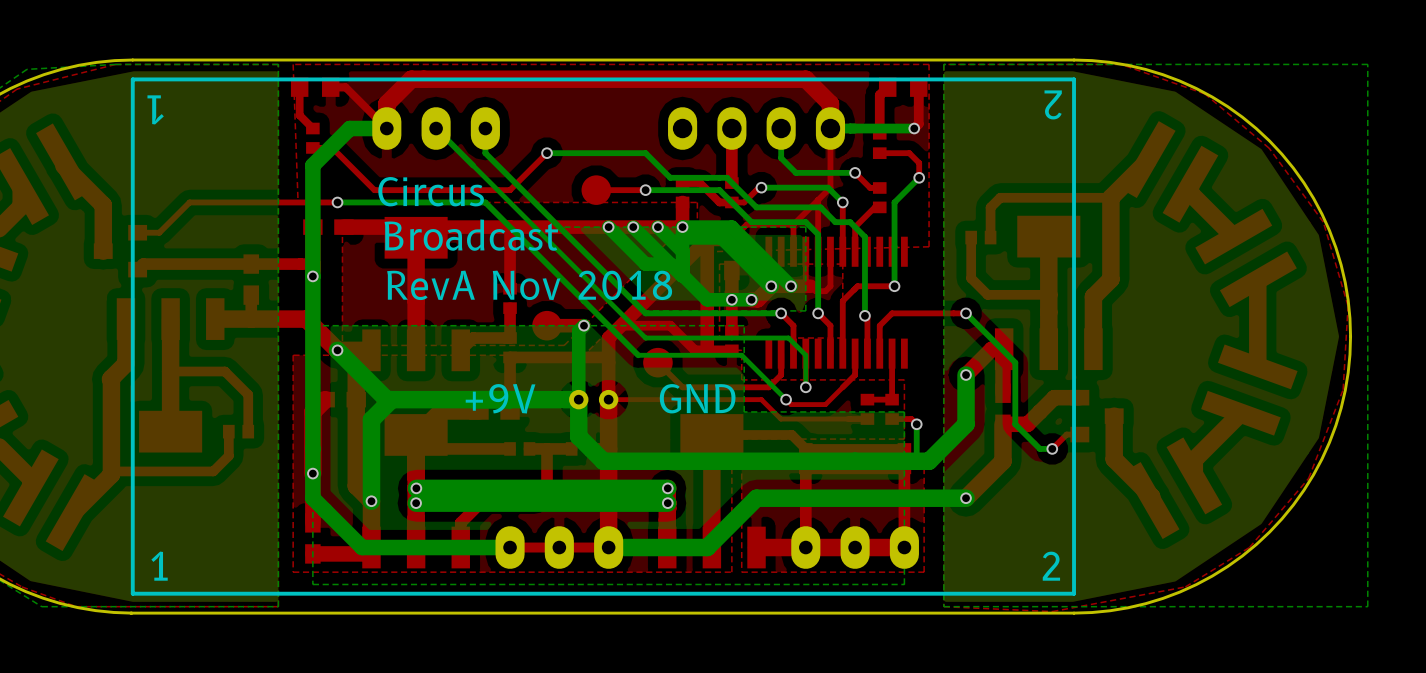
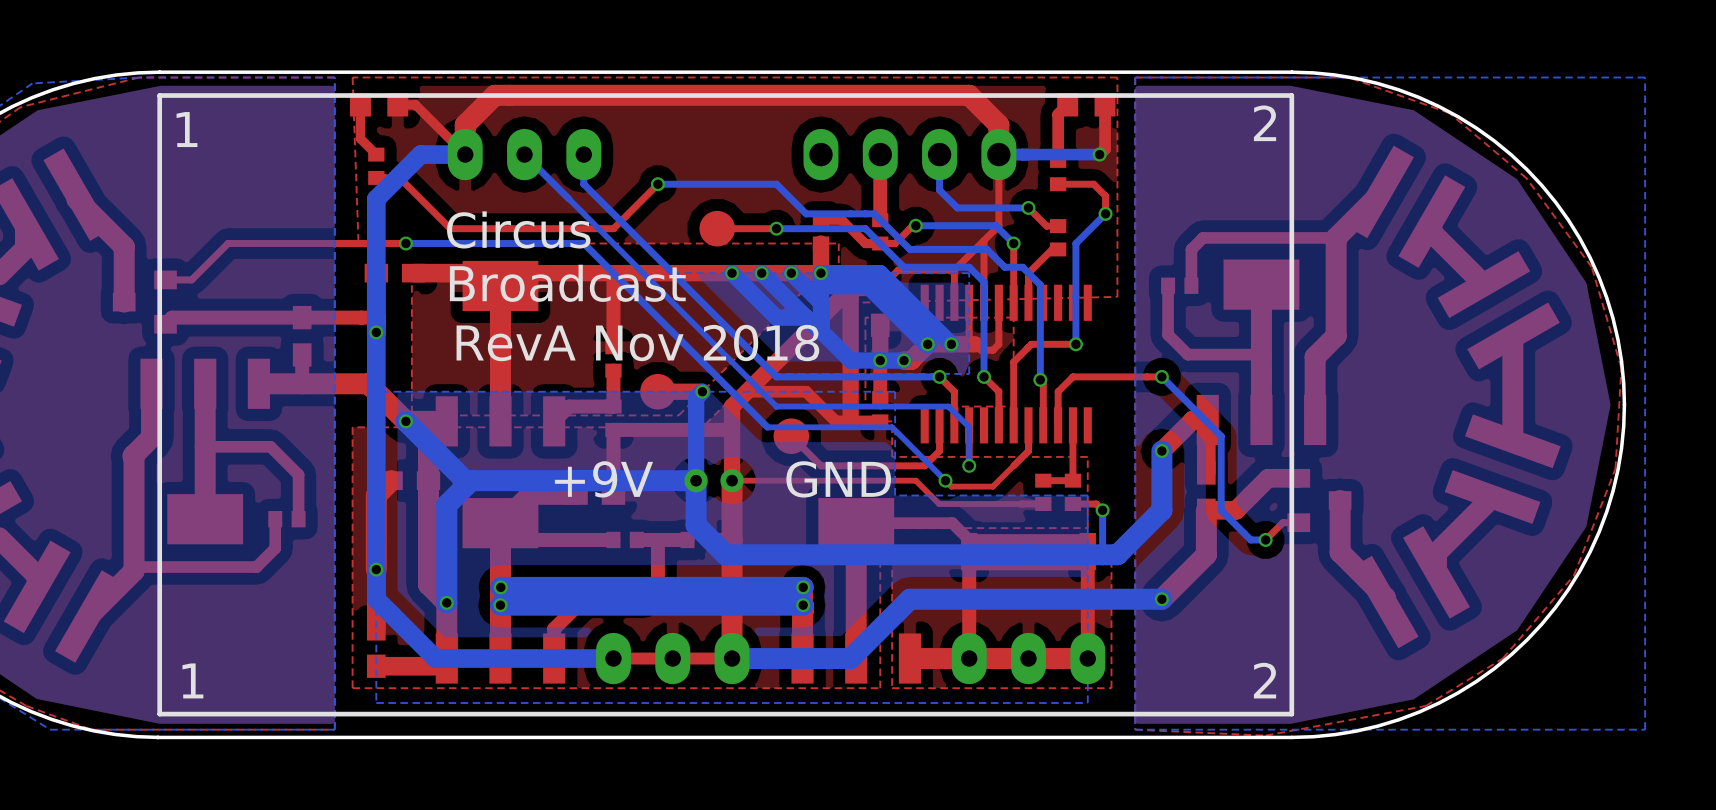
text rotation: 0° (1053, 104) -> 180° (1265, 123)
text rotation: 0° (155, 109) -> 180° (187, 129)

